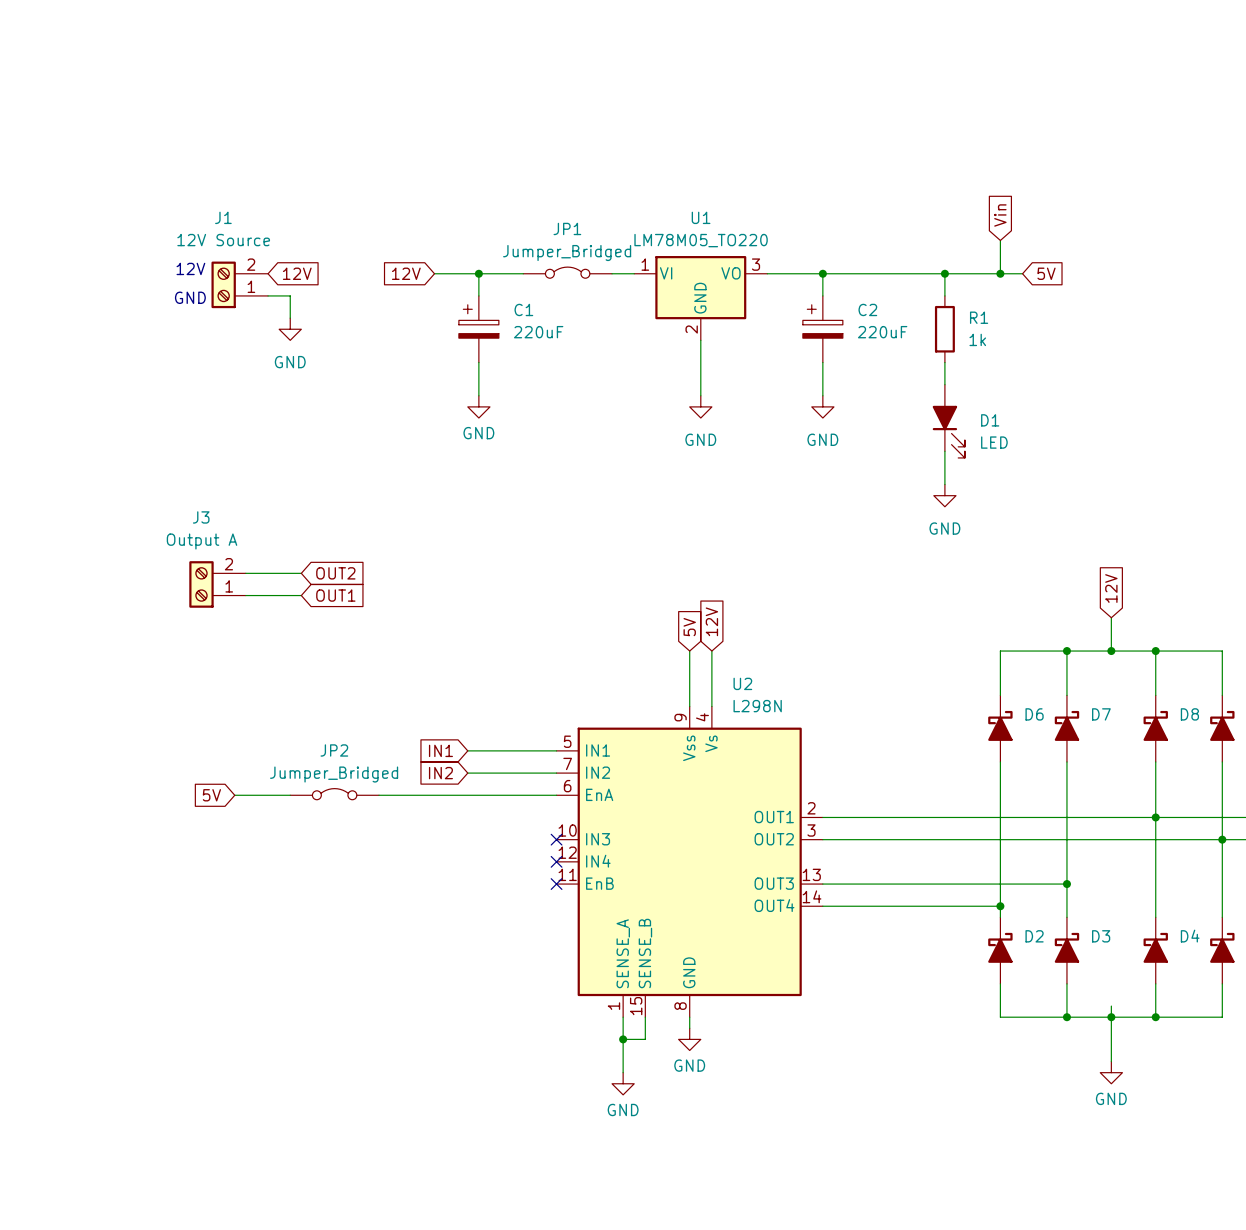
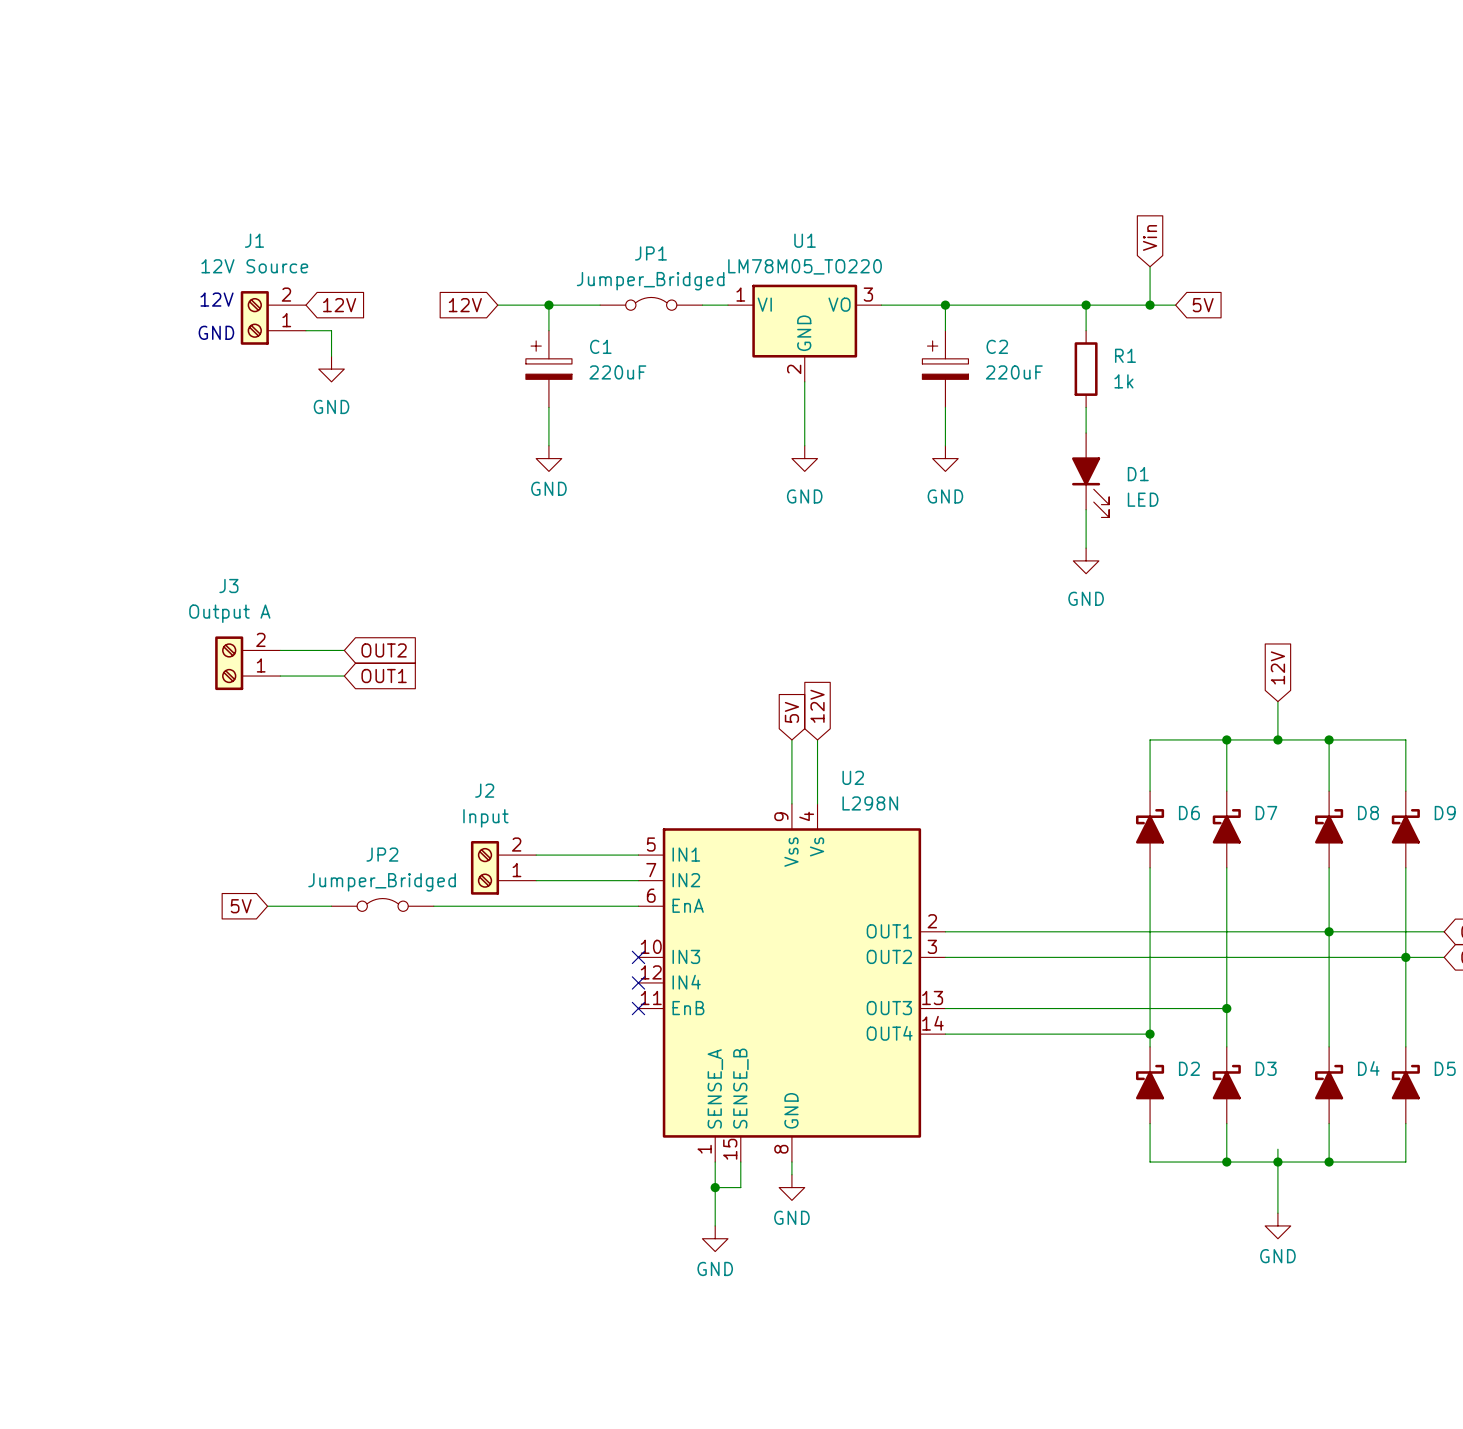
global label: IN1 (440, 750) -> none
J2: none -> Input (503, 867)
global label: IN2 (440, 773) -> none

